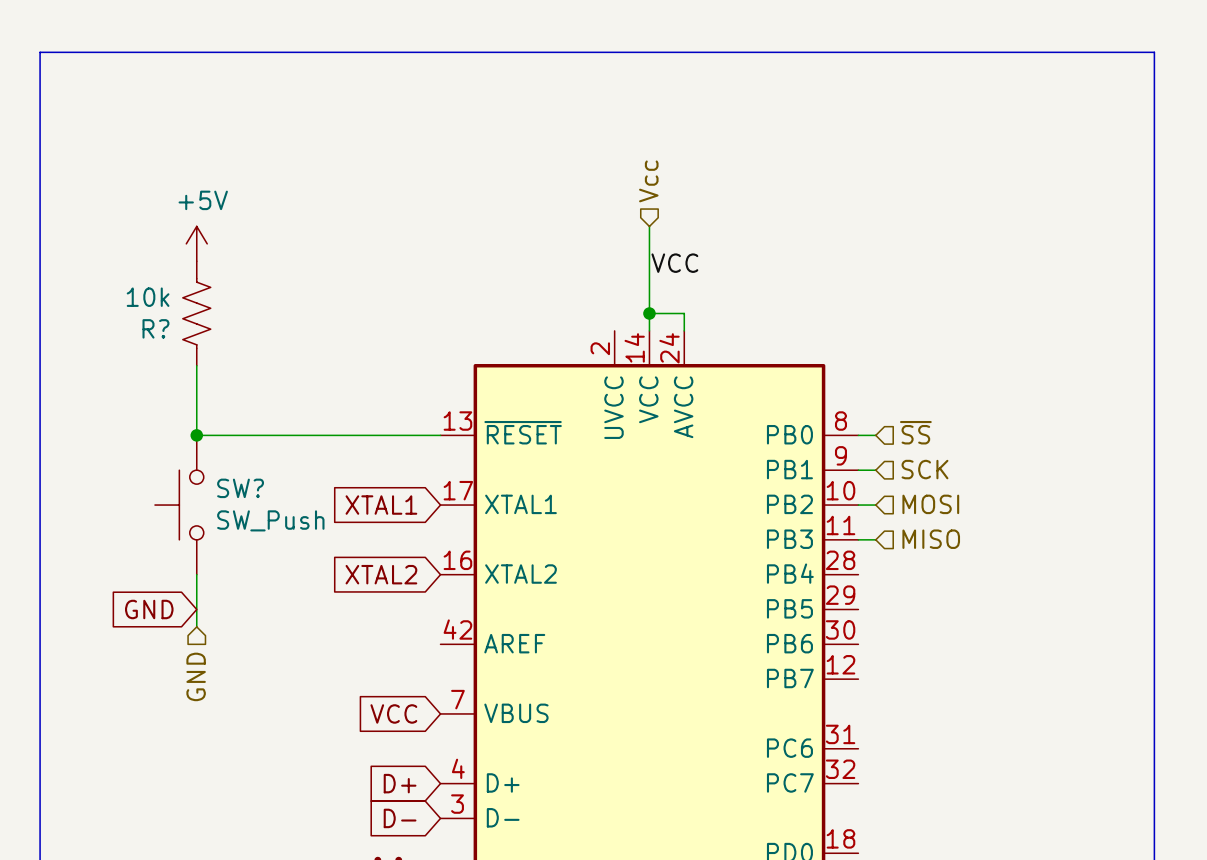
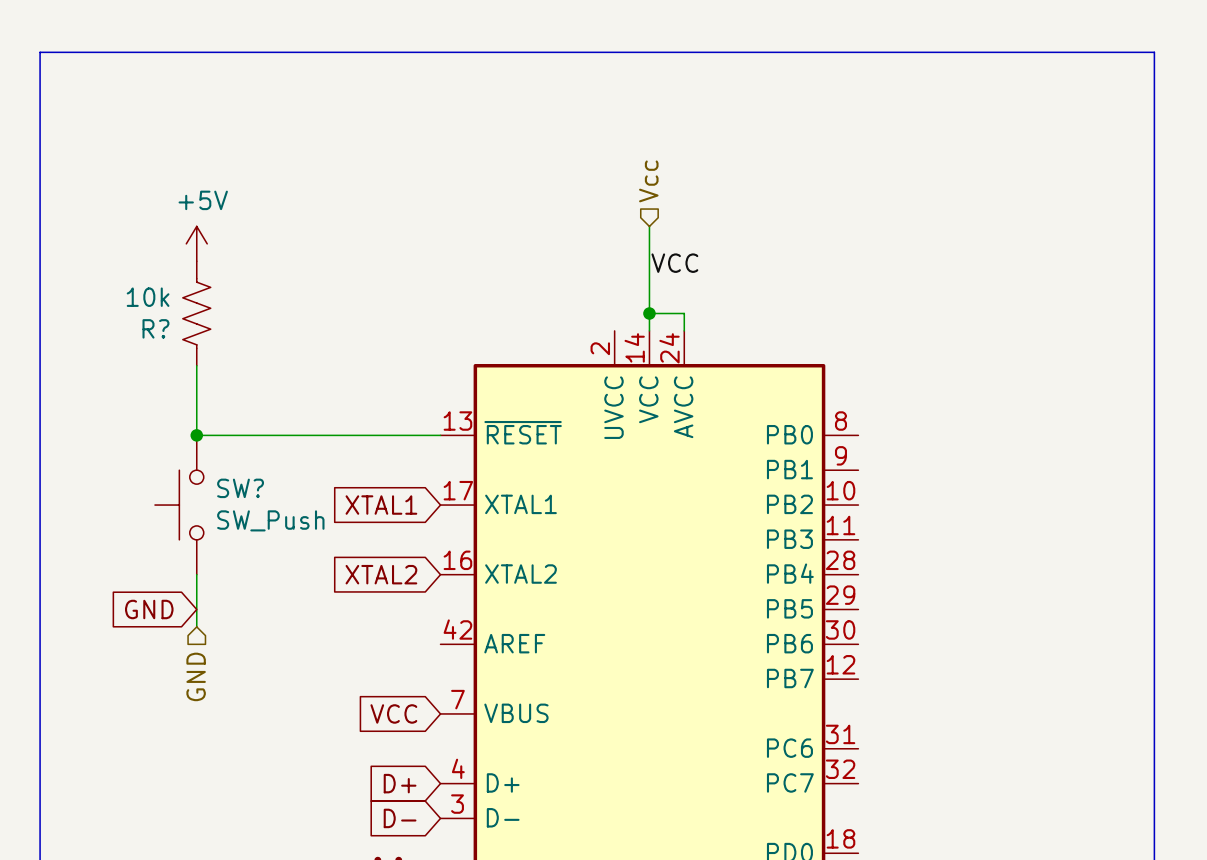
hierarchical label: ~{SS} (915, 432) -> none
wire: (858, 435) (875, 435) -> none
hierarchical label: SCK (924, 469) -> none
wire: (858, 470) (875, 470) -> none
hierarchical label: MOSI (930, 504) -> none
wire: (858, 505) (875, 505) -> none
wire: (858, 539) (875, 539) -> none
hierarchical label: MISO (931, 539) -> none

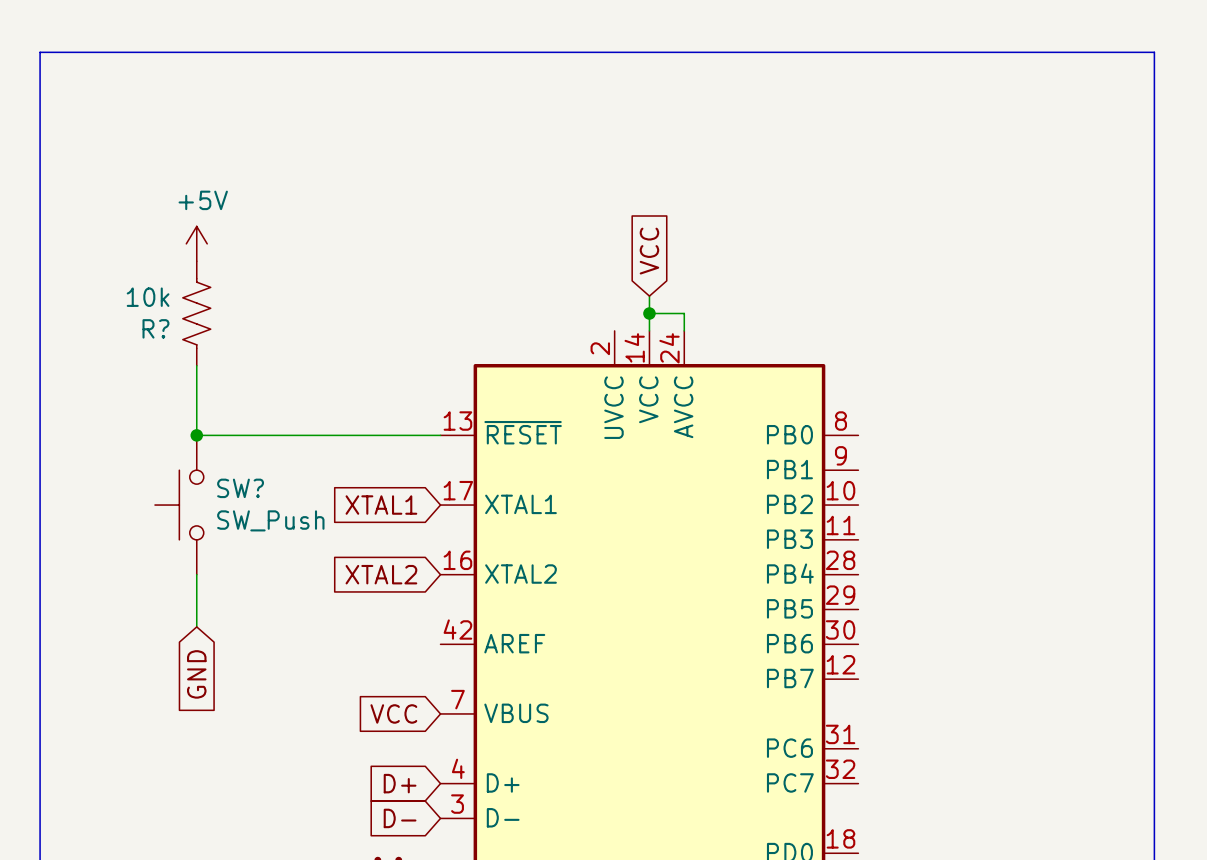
hierarchical label: Vcc (648, 181) -> none
wire: (649, 226) (649, 296) -> none
global label: none -> VCC (649, 251)
label: VCC (674, 263) -> none
global label rotation: 0° (149, 609) -> 90° counterclockwise (196, 674)
hierarchical label: GND (196, 676) -> none

